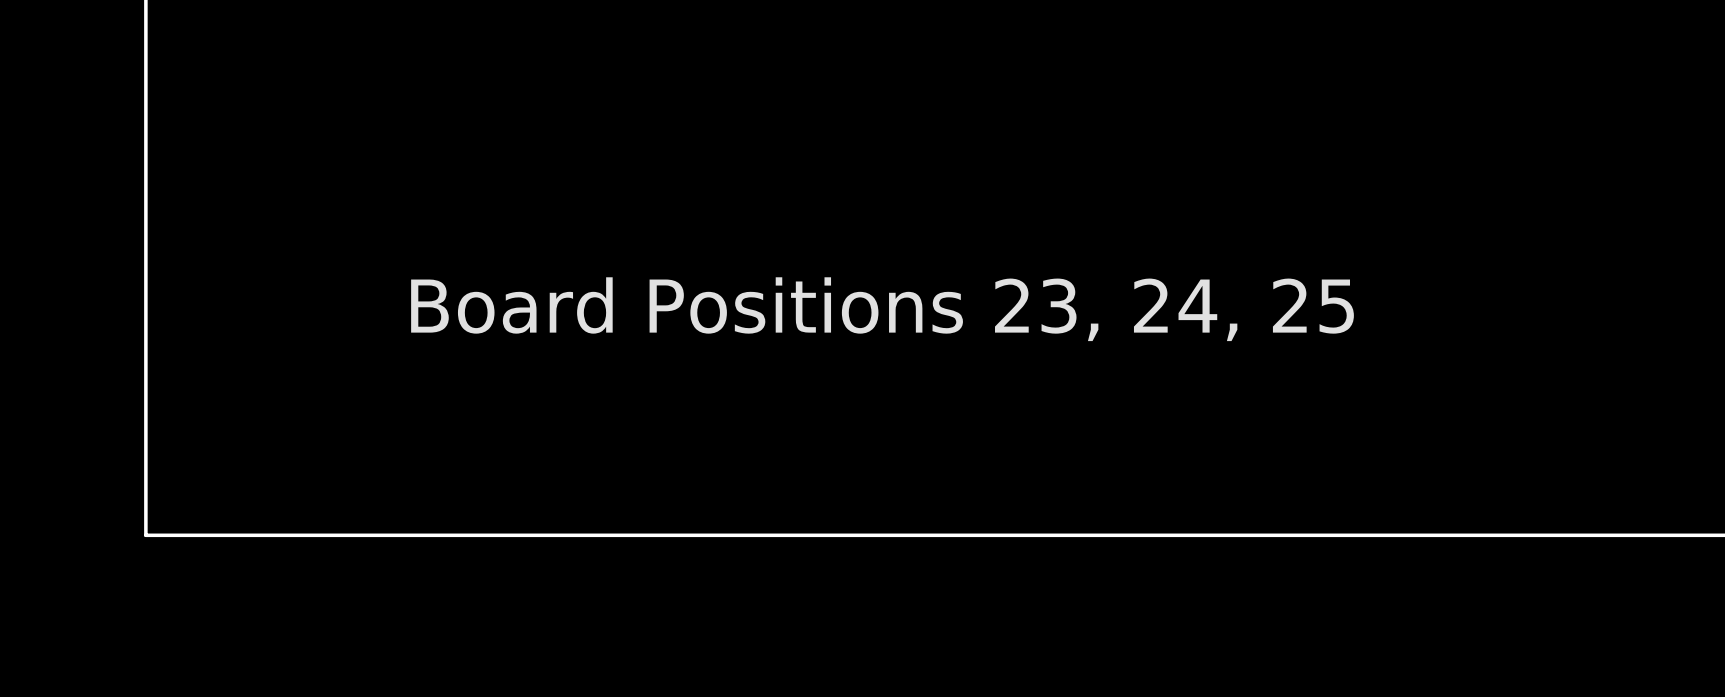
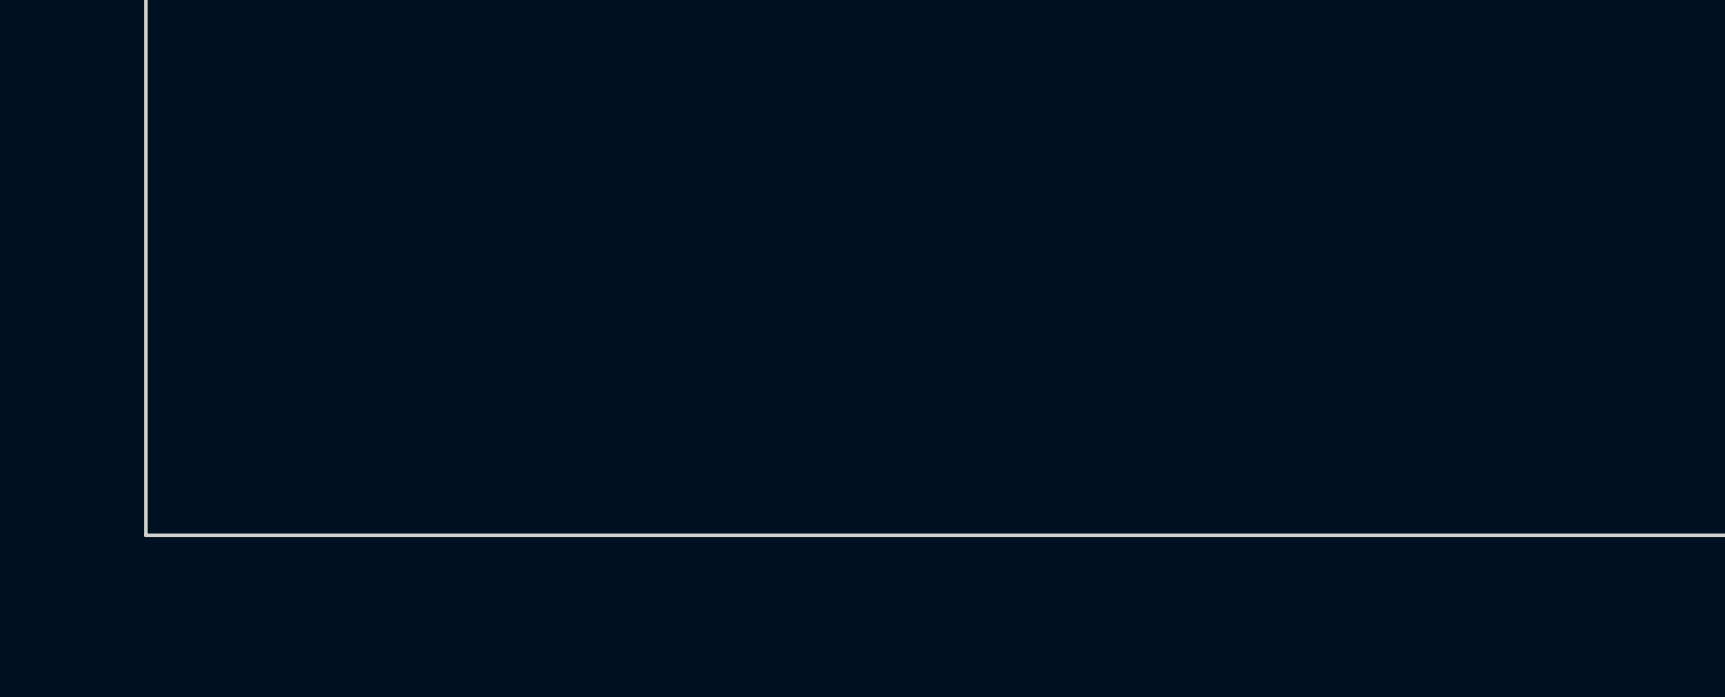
text: Board Positions 23, 24, 25 (882, 309) -> none

